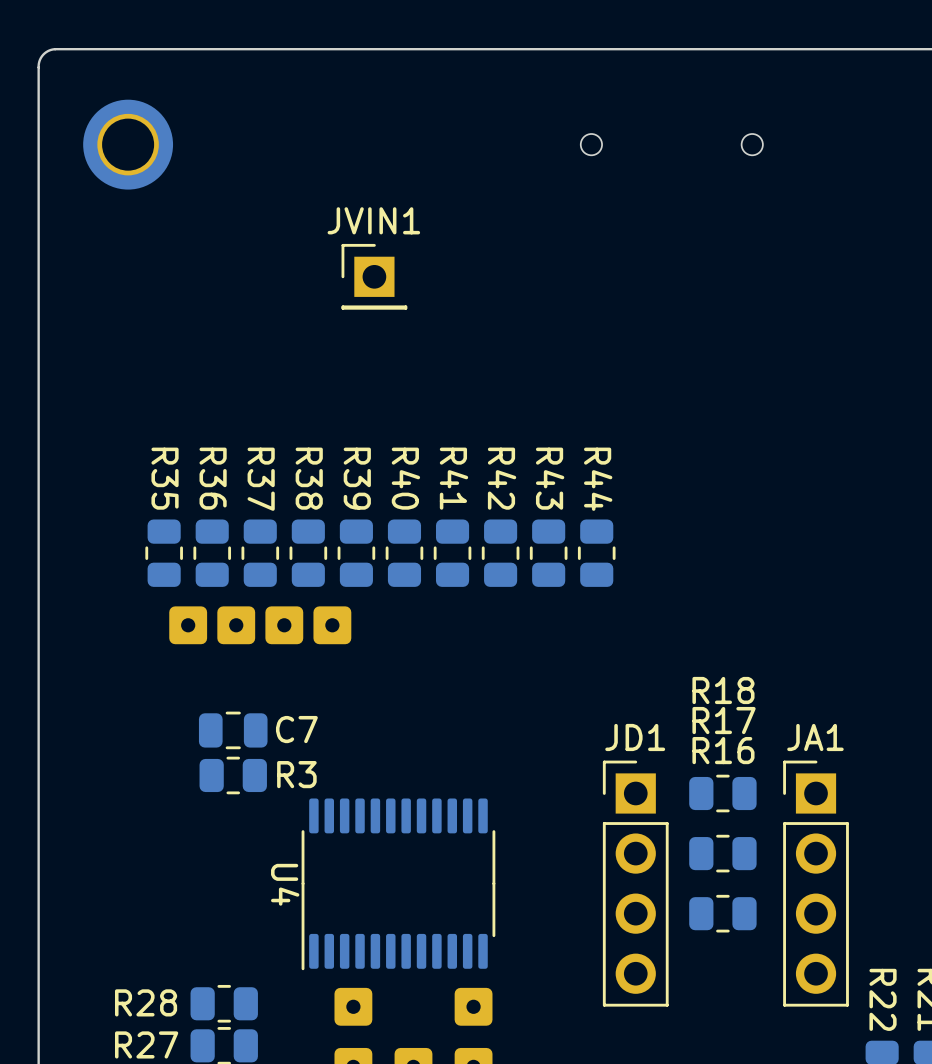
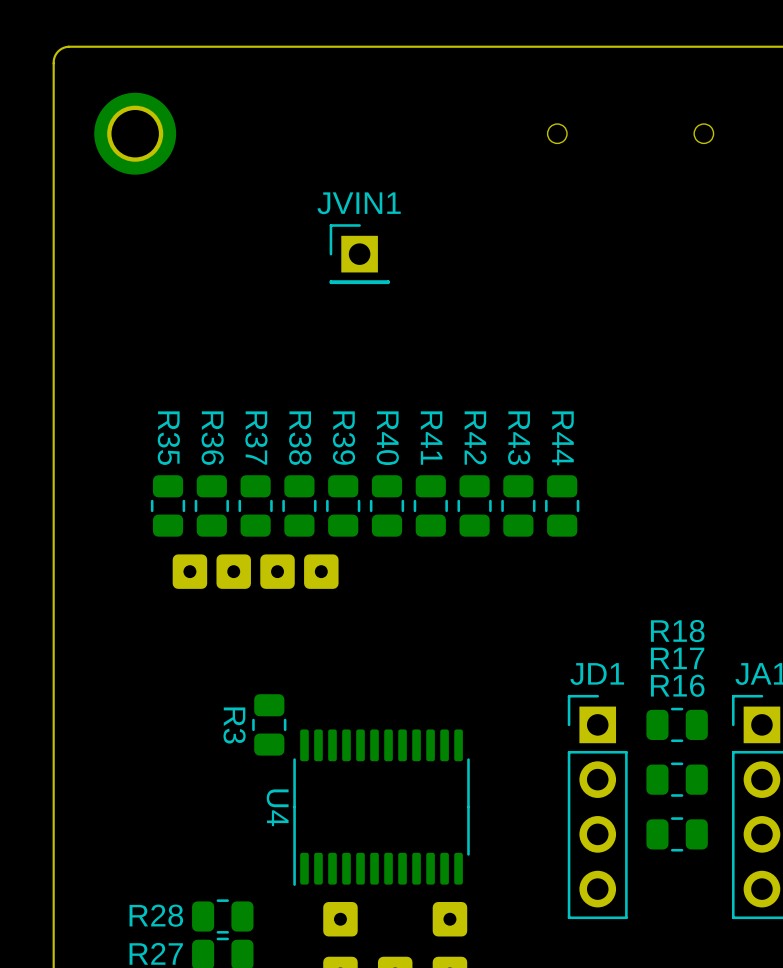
C7: (233, 730) -> none
R3 name position: R3 (296, 774) -> R3 (234, 725)
R3 rotation: 0° (233, 775) -> 90° clockwise (269, 724)
R3 position: (233, 775) -> (269, 724)

